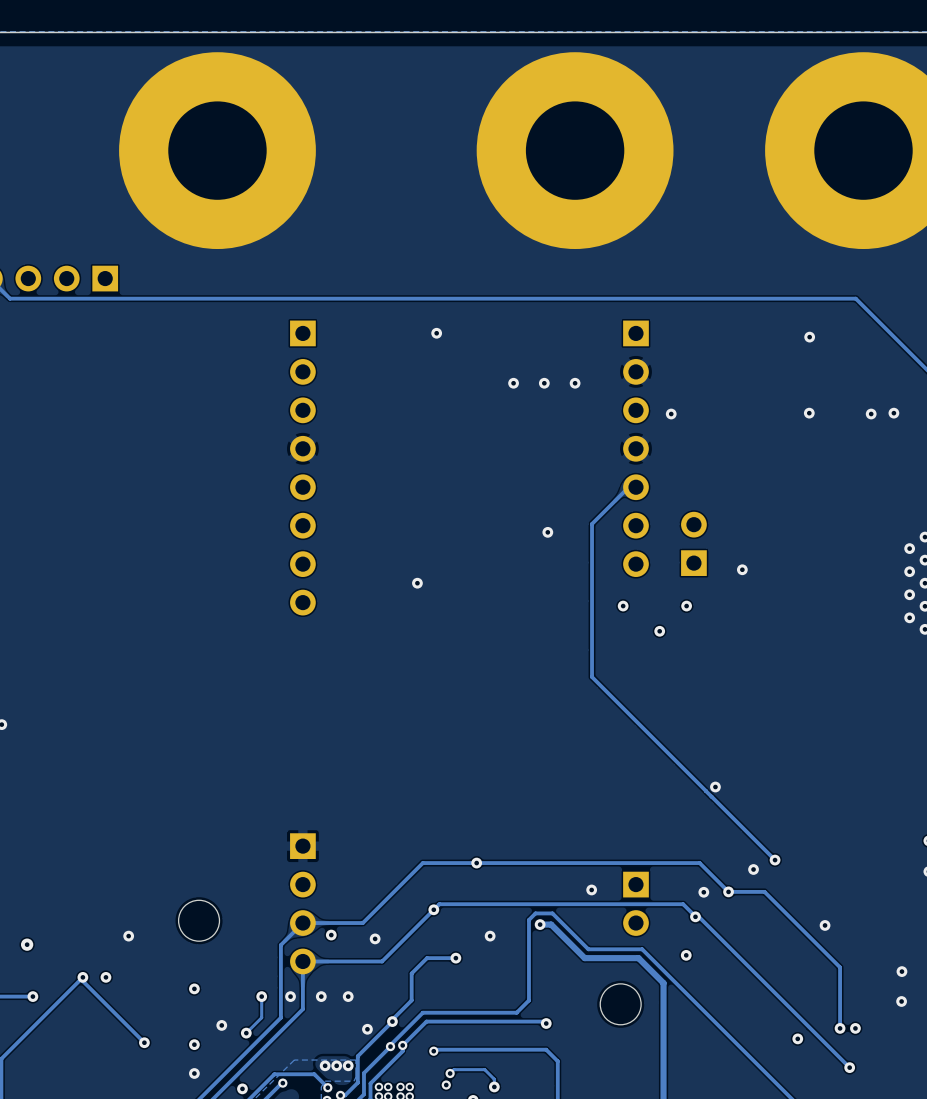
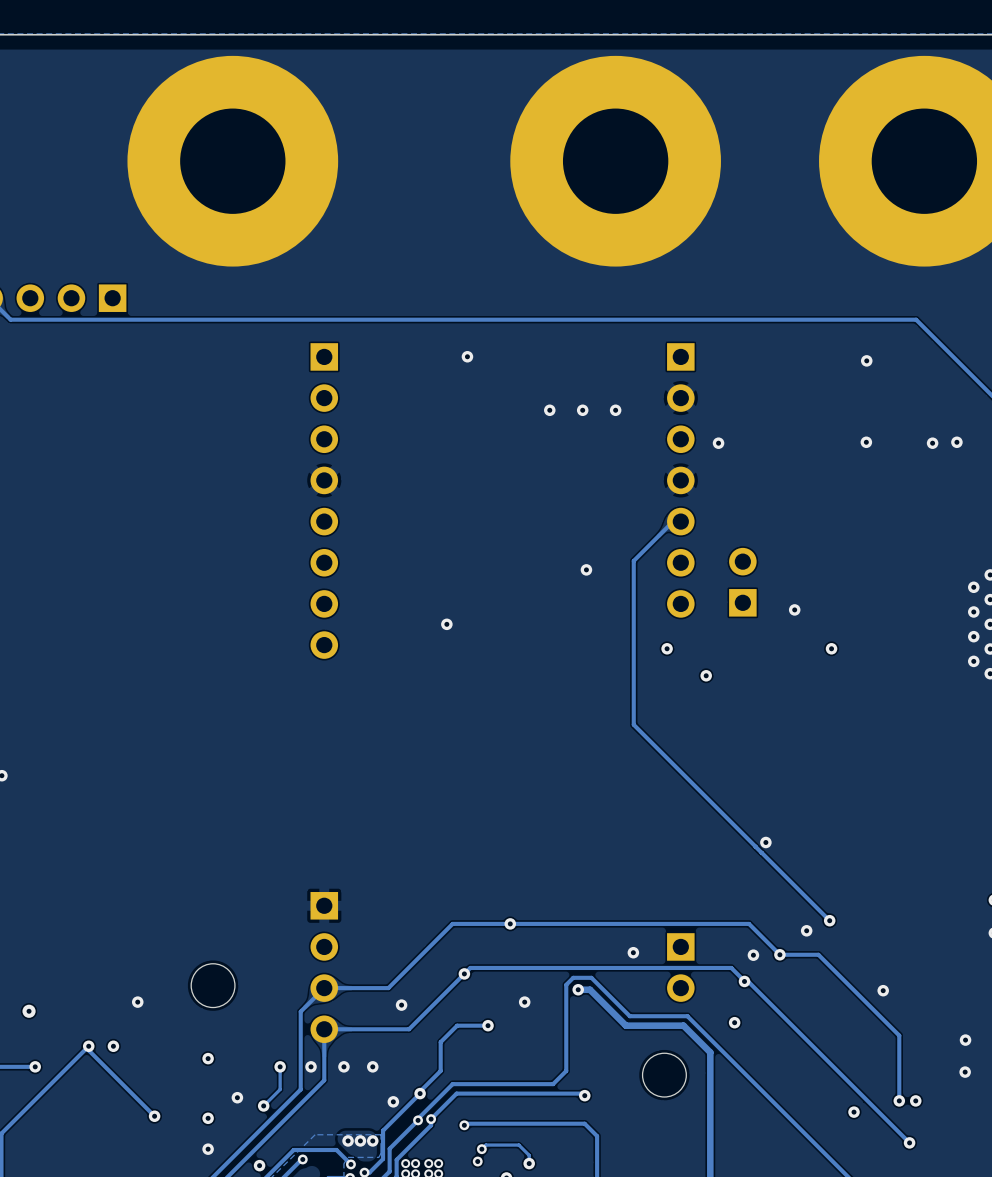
via position: (686, 606) -> (831, 648)
via: (331, 935) -> none

